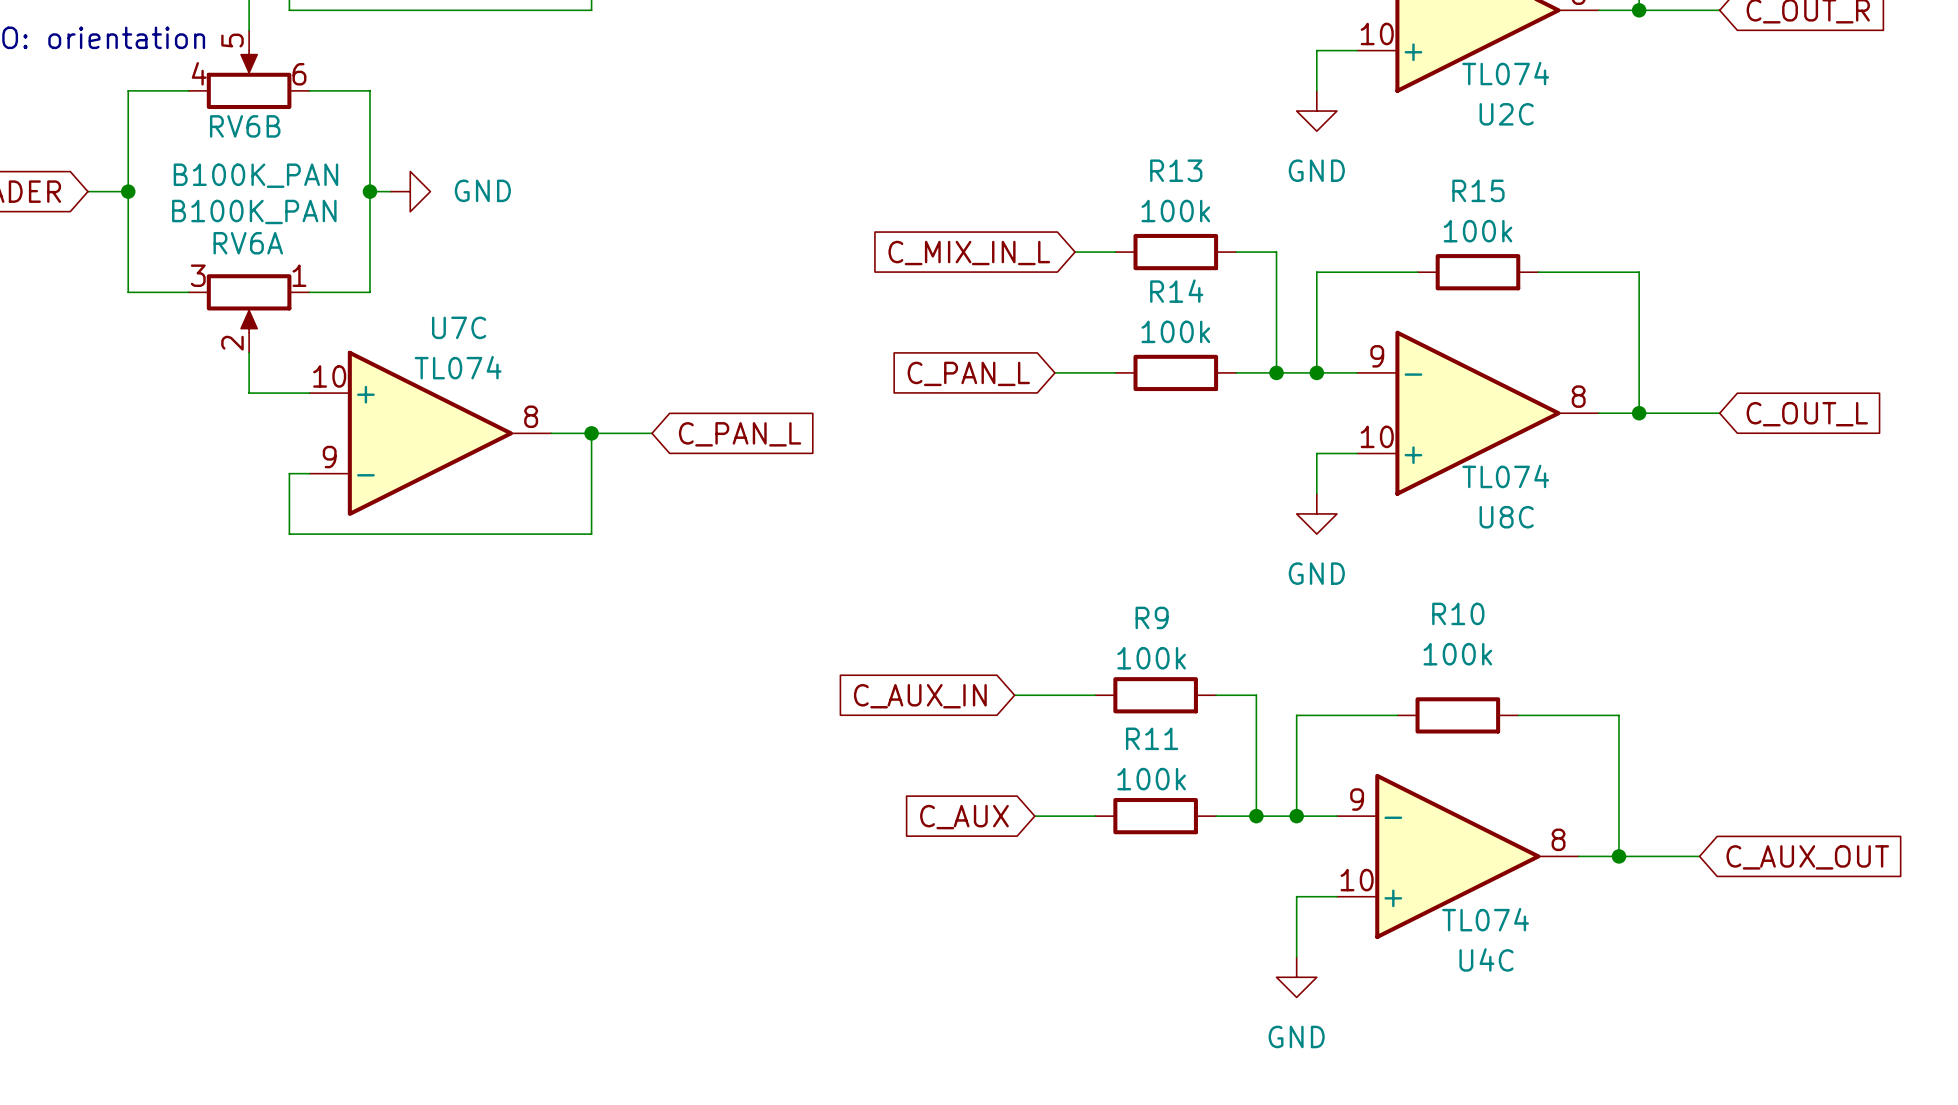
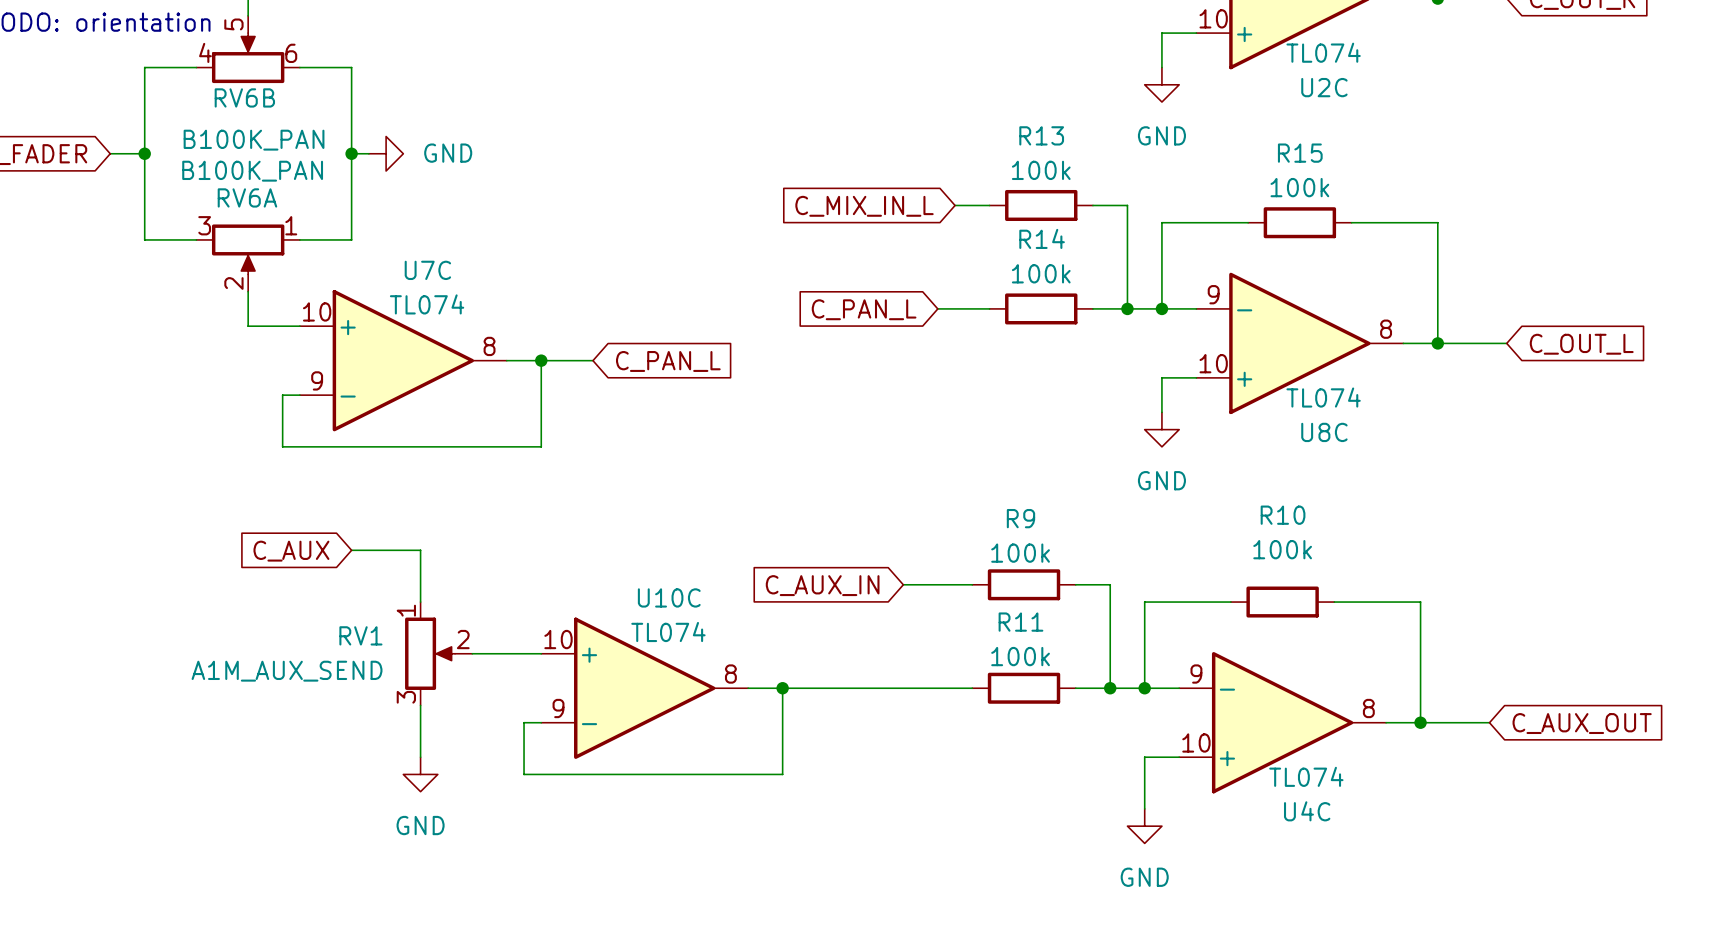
wire: none -> (351, 550) (420, 550) (420, 602)
global label: none -> C_AUX (291, 551)
RV1: none -> A1M_AUX_SEND (438, 653)
wire: none -> (472, 653) (541, 653)
U10C: none -> TL074 (644, 688)
wire: none -> (748, 688) (920, 688)
wire: none -> (782, 688) (782, 774) (524, 774) (524, 722) (541, 722)
junction: none -> (782, 688)
global label: C_AUX (964, 817) -> none
wire: none -> (420, 705) (420, 757)
power symbol: none -> GND (420, 774)

